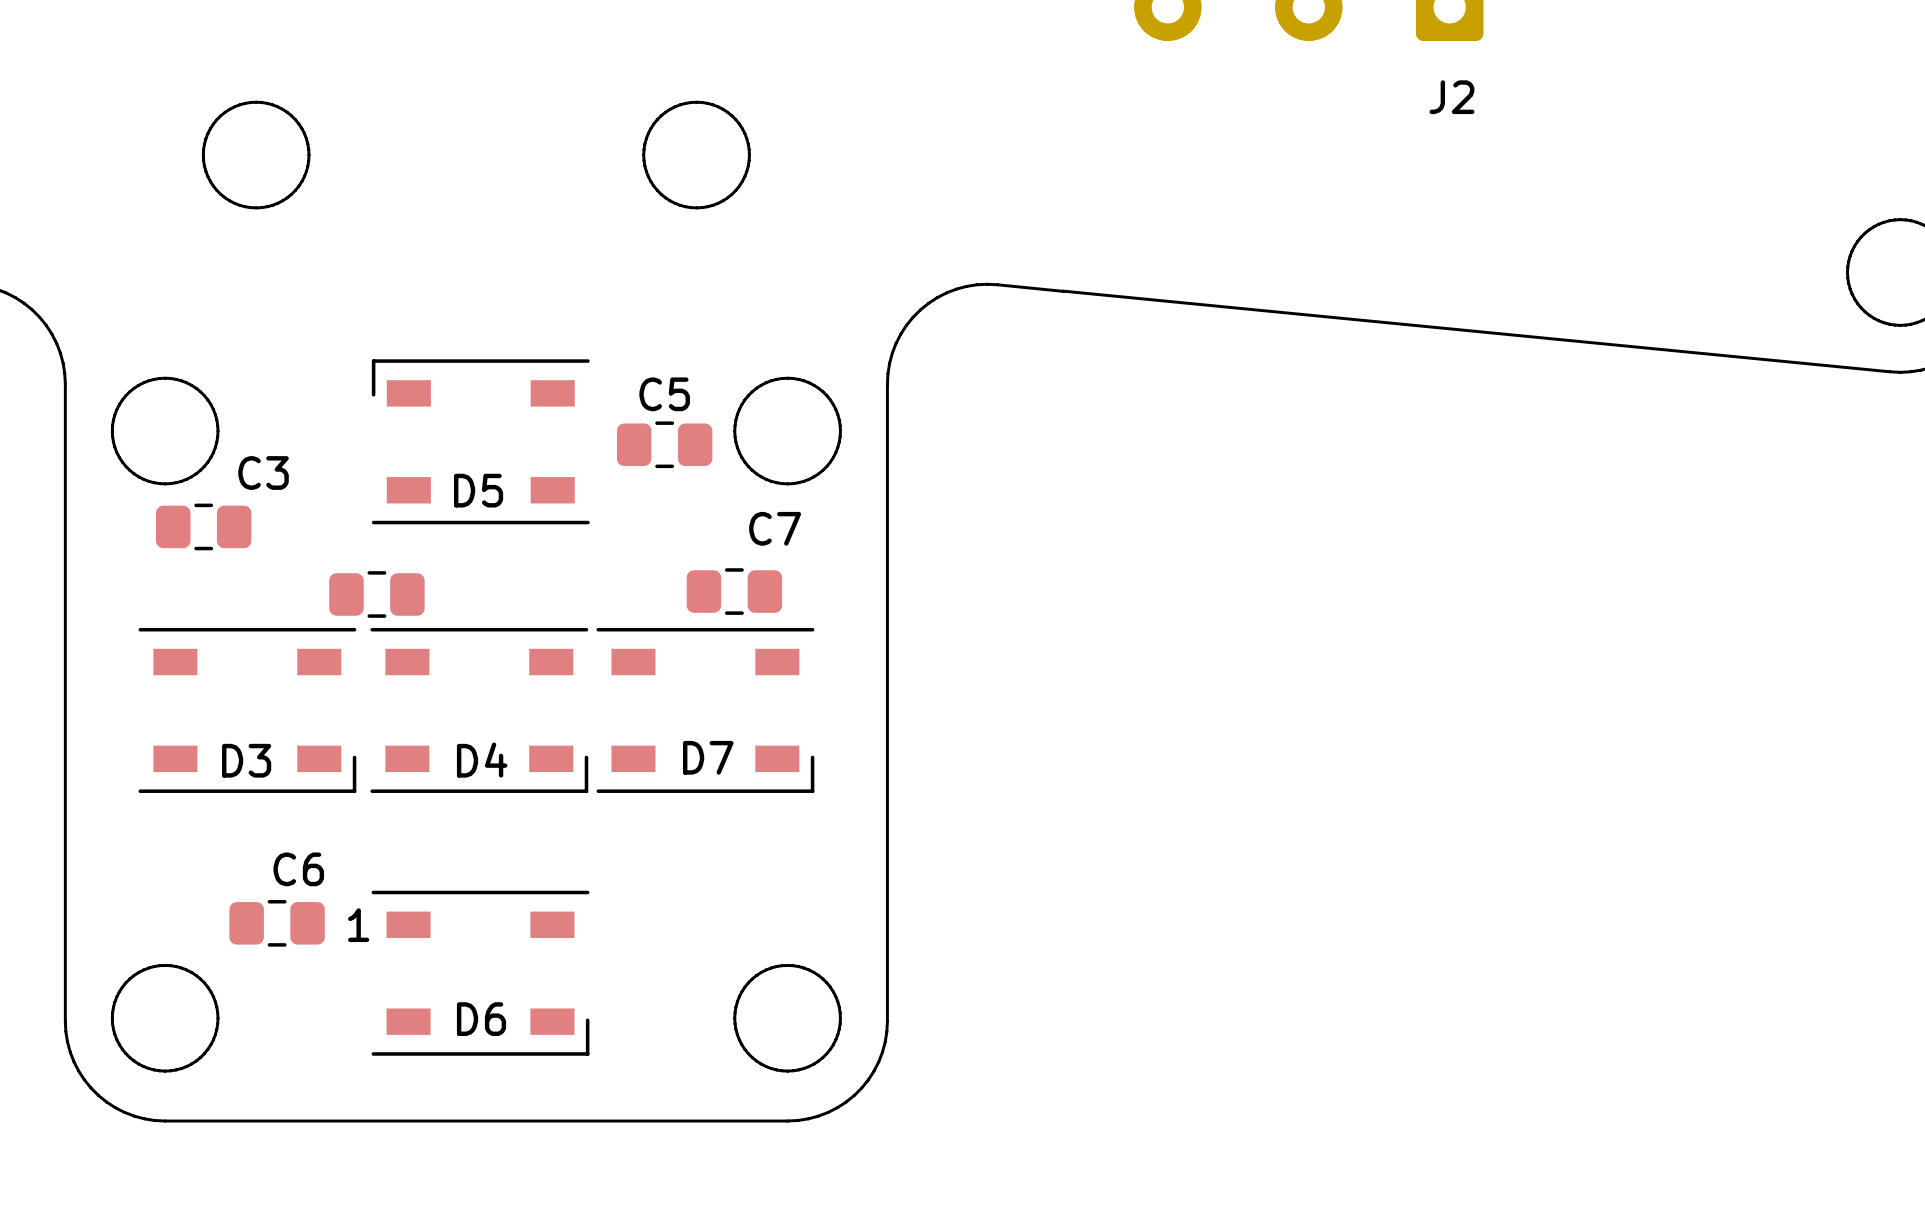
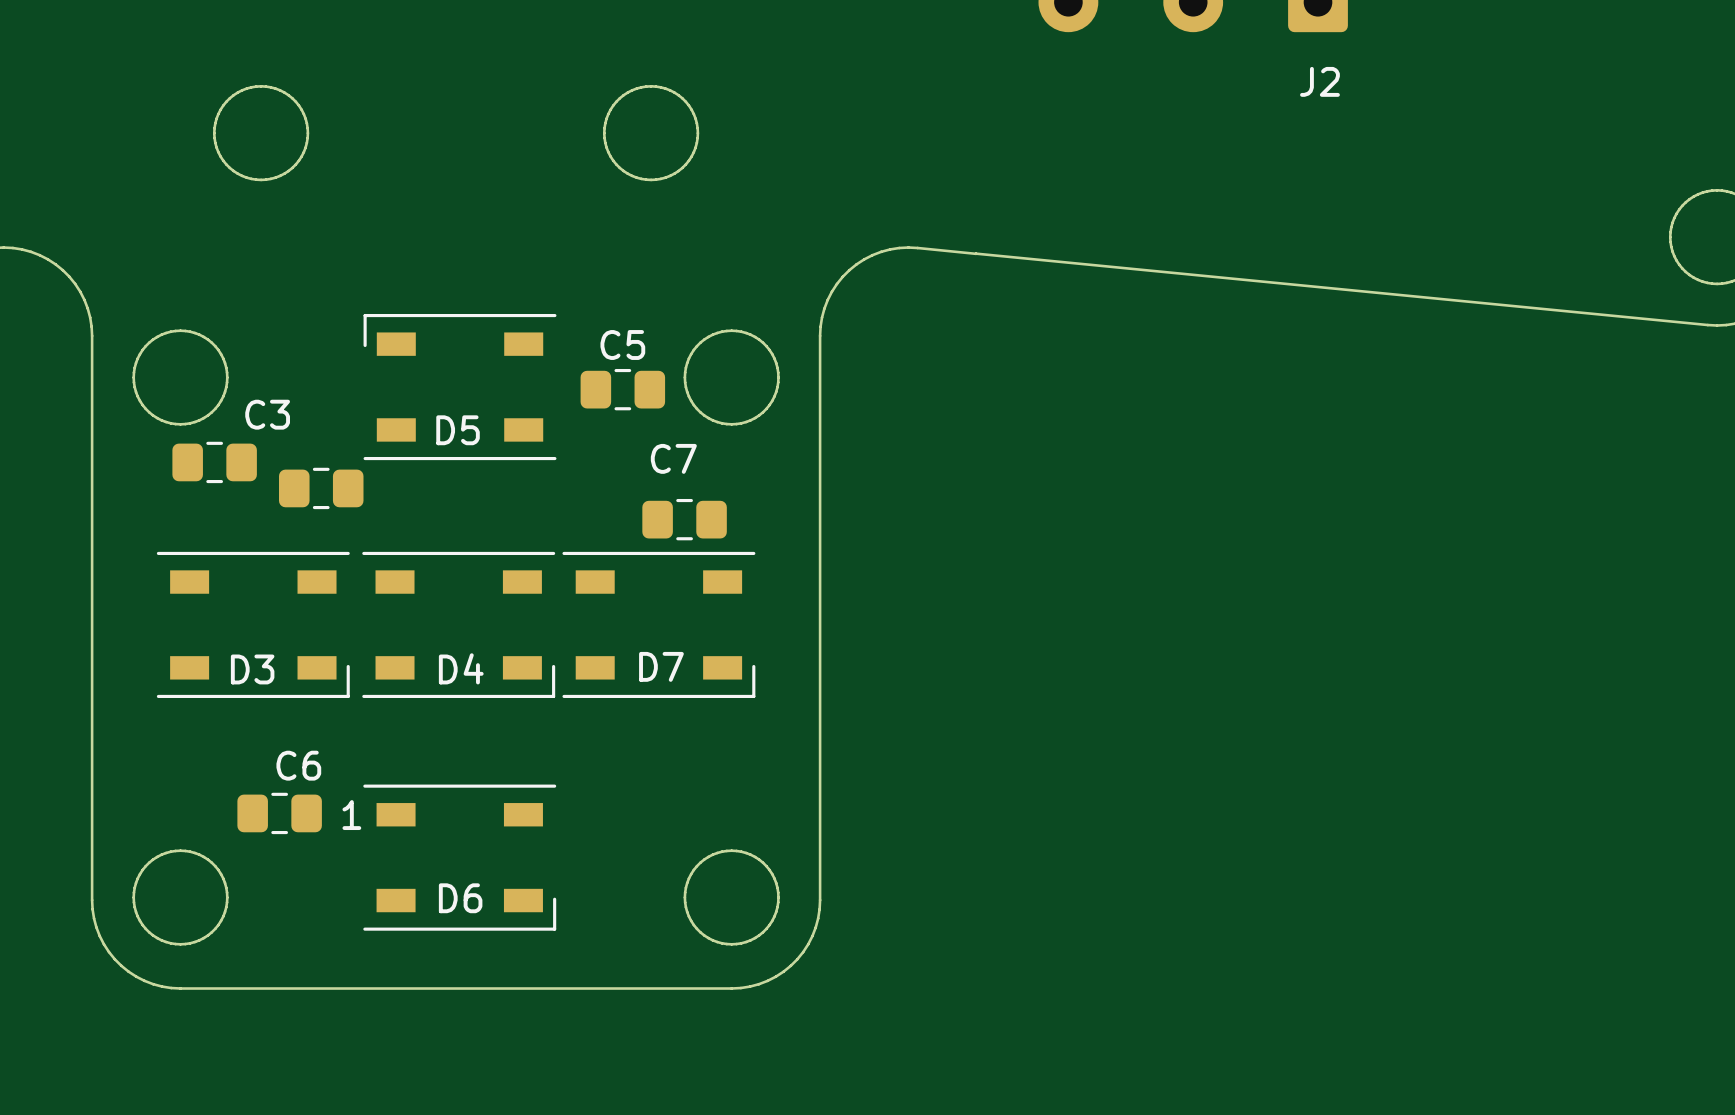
C7 name position: C7 (775, 528) -> C7 (673, 458)
part position: (376, 594) -> (321, 488)

